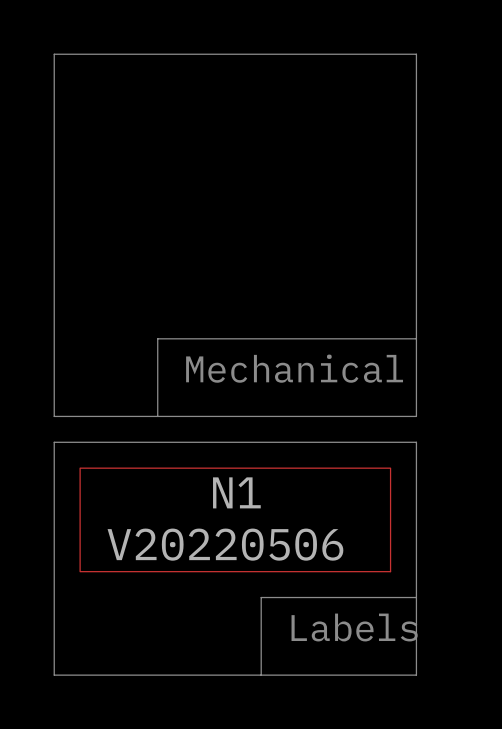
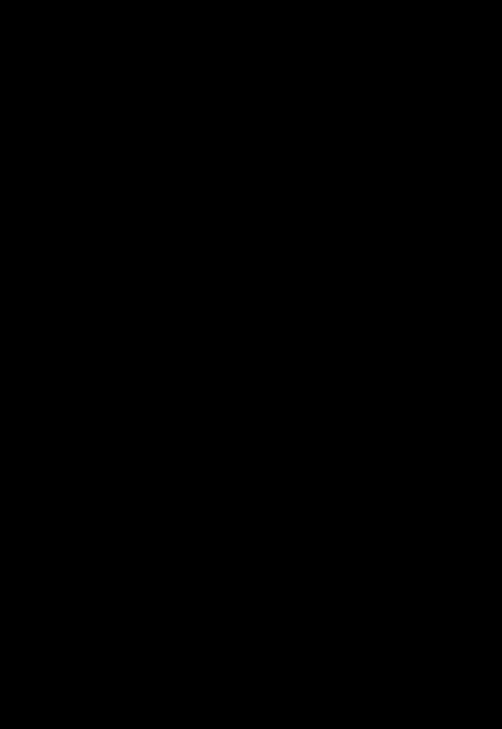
line: (54, 54) (54, 416) (416, 416) (416, 54) (54, 54) -> none
line: (416, 338) (157, 338) (157, 416) -> none
text: Mechanical (294, 368) -> none
line: (54, 442) (416, 442) (416, 675) (54, 675) (54, 442) -> none
N1: V20220506 (235, 519) -> none
line: (416, 597) (261, 597) (261, 675) -> none
text: Labels (354, 627) -> none

